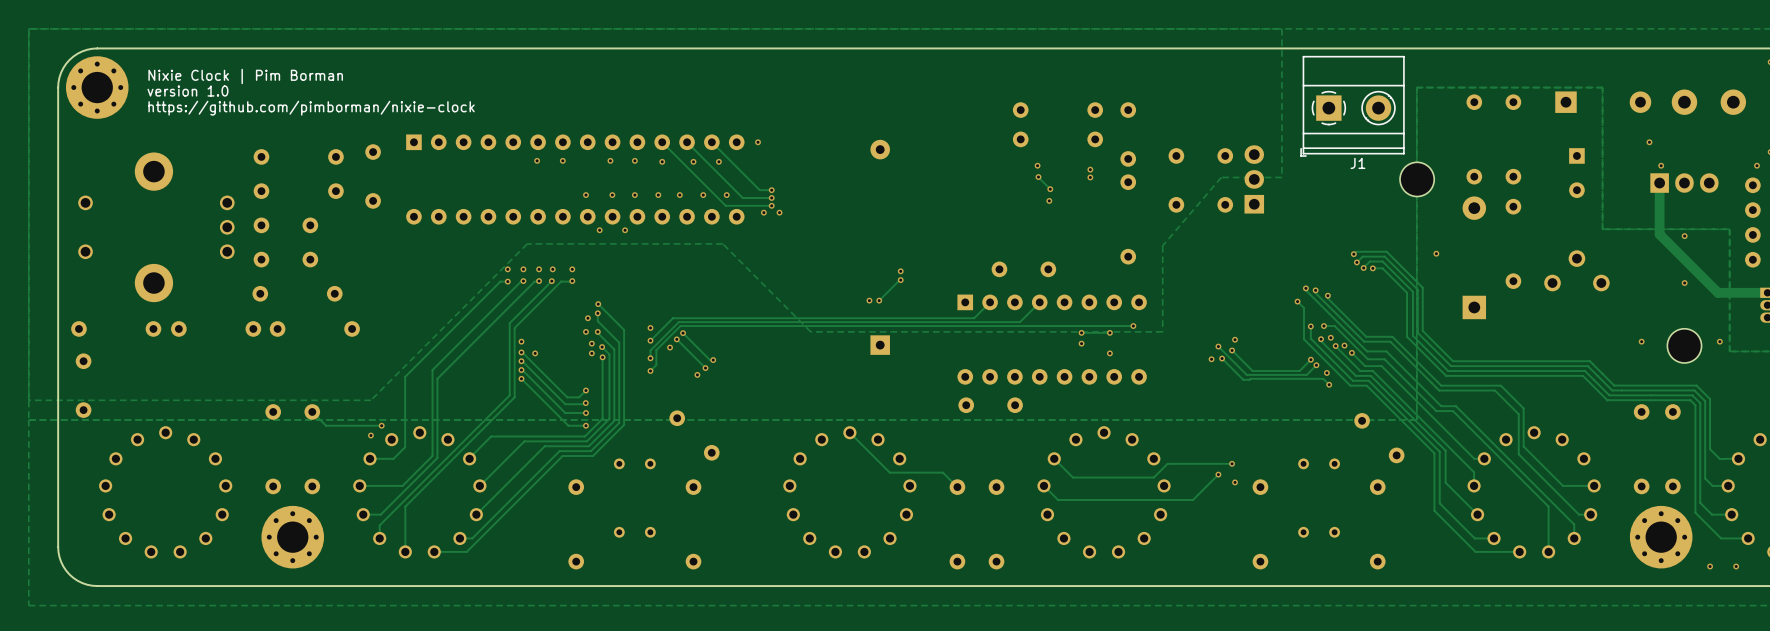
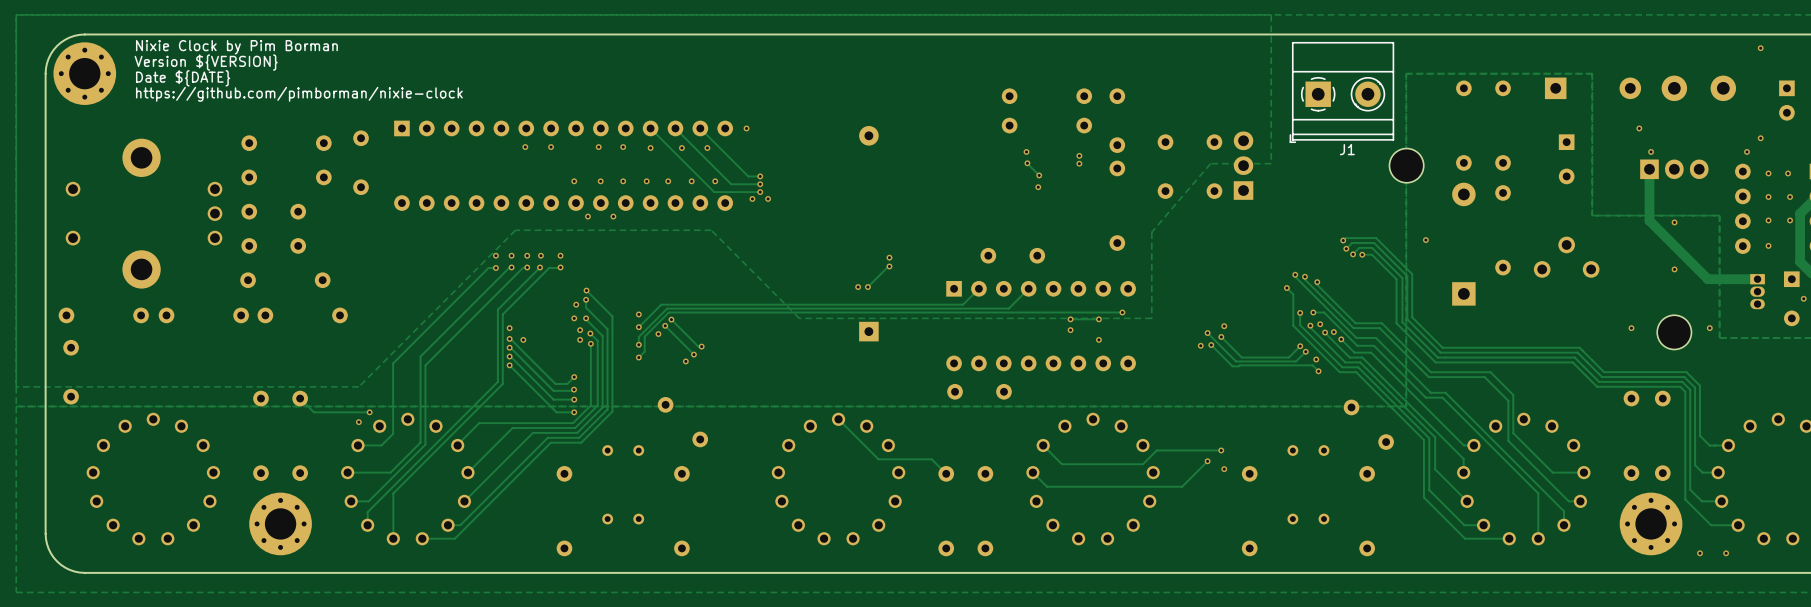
text: none -> Nixie Clock by Pim Borman (236, 47)
text: Nixie Clock | Pim Borman (245, 76) -> Version ${VERSION} (206, 62)
text: version 1.0 (187, 91) -> Date ${DATE} (183, 78)

